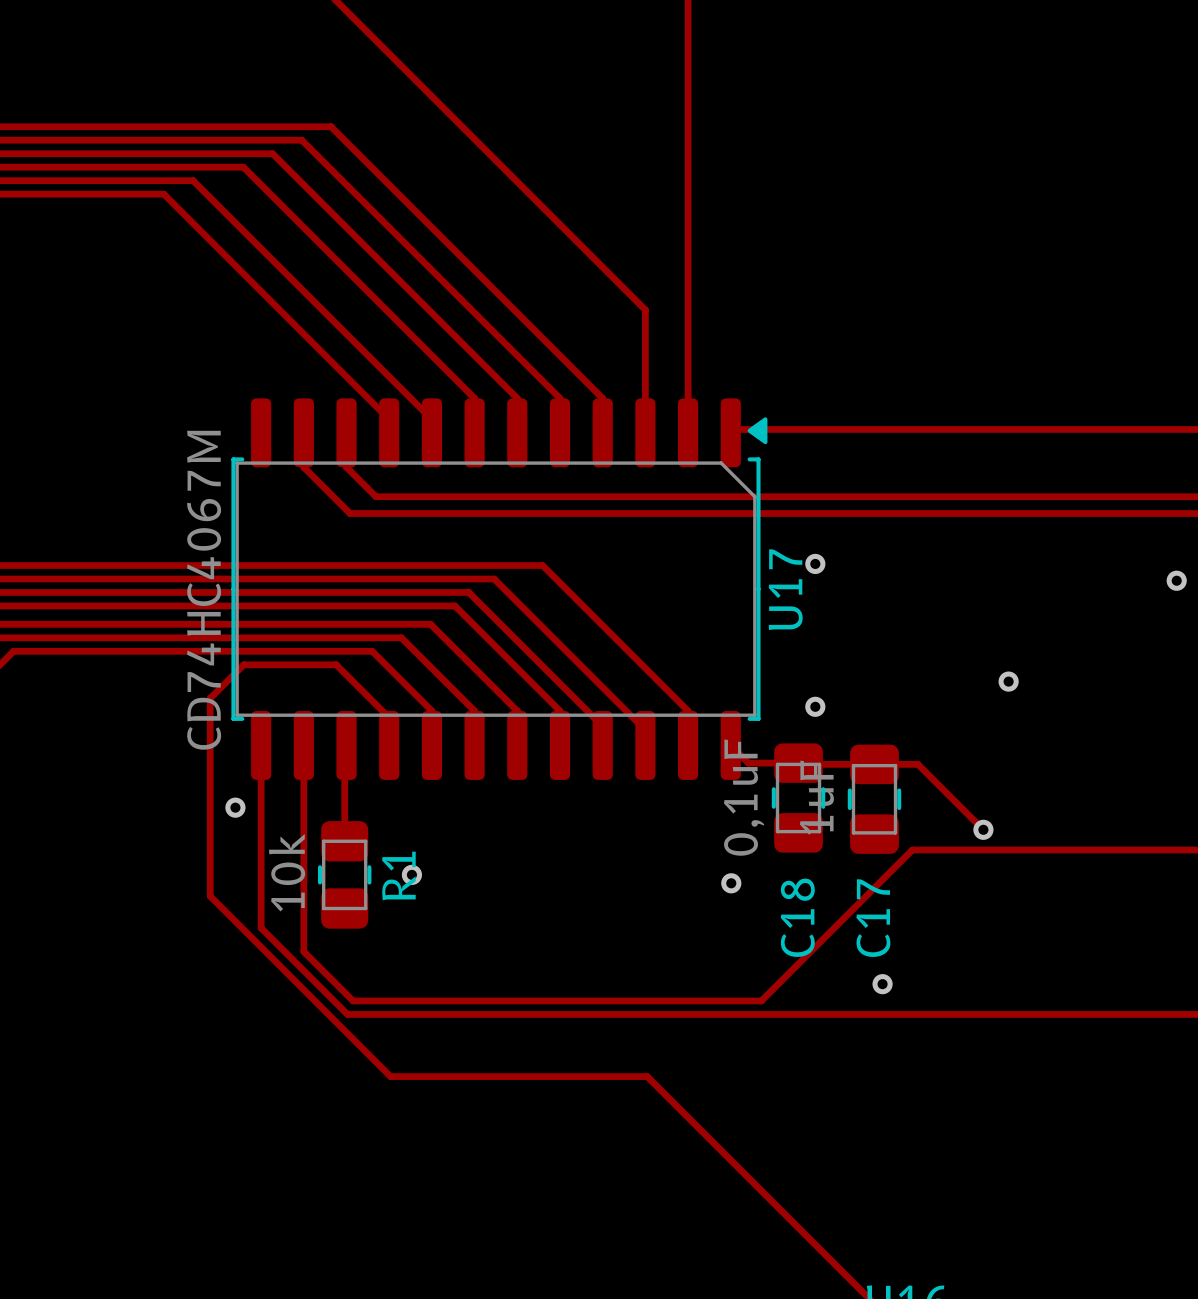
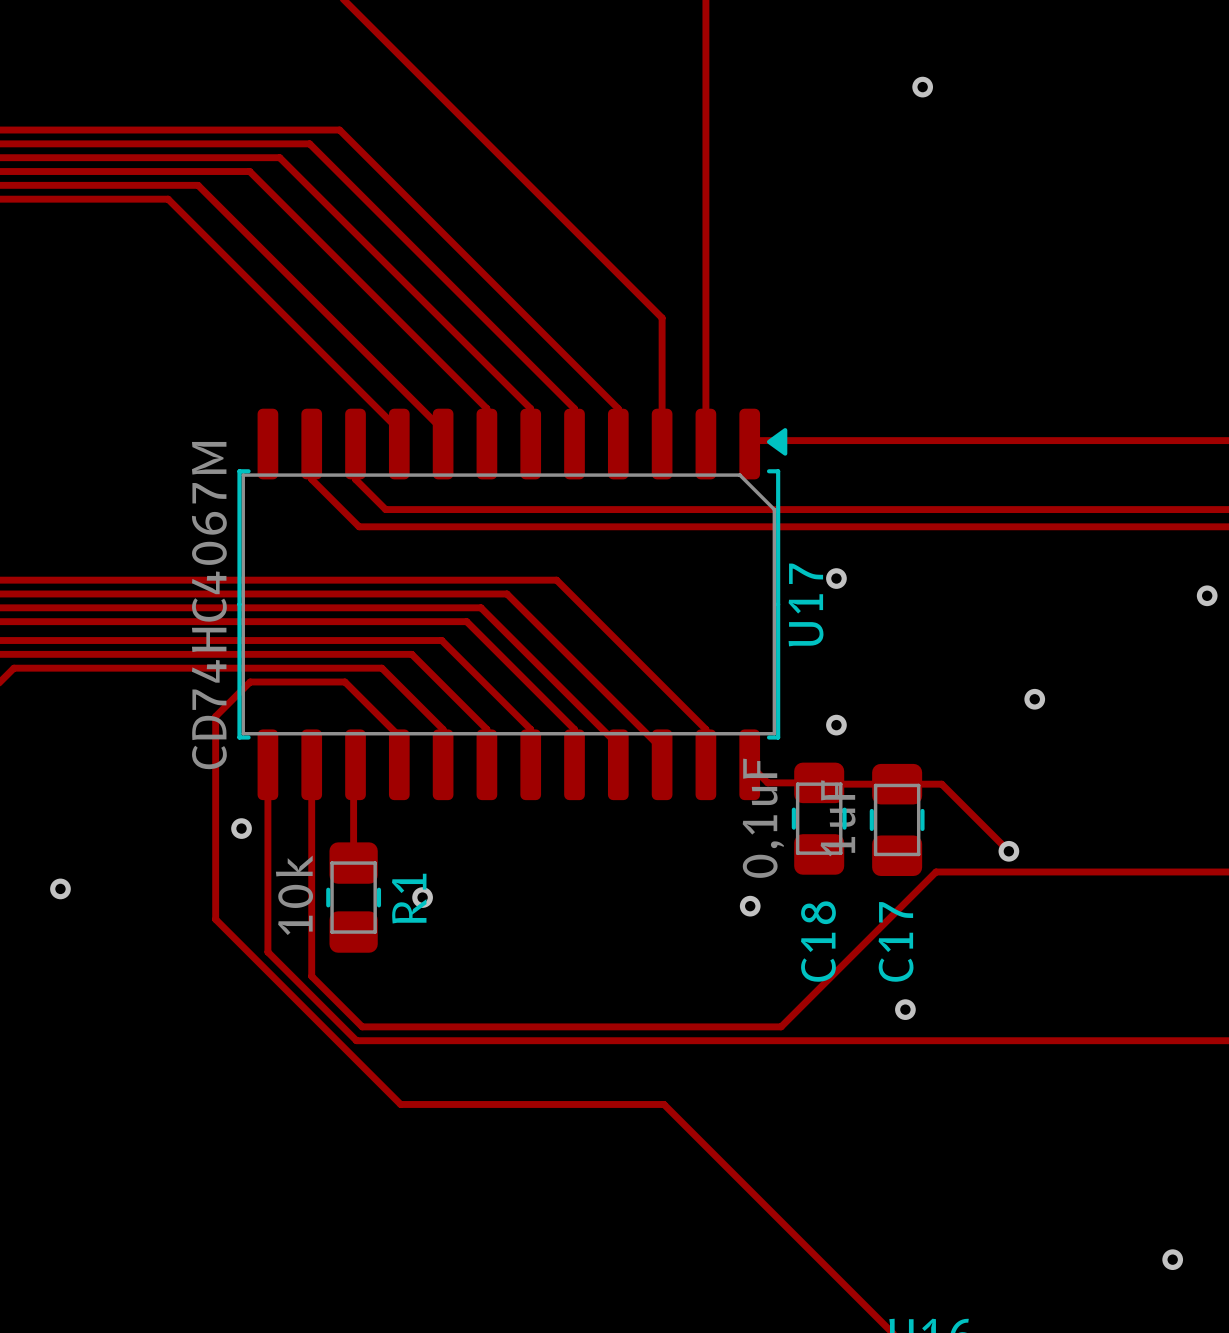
via: none -> (922, 87)
via: none -> (60, 888)
via: none -> (1172, 1259)

